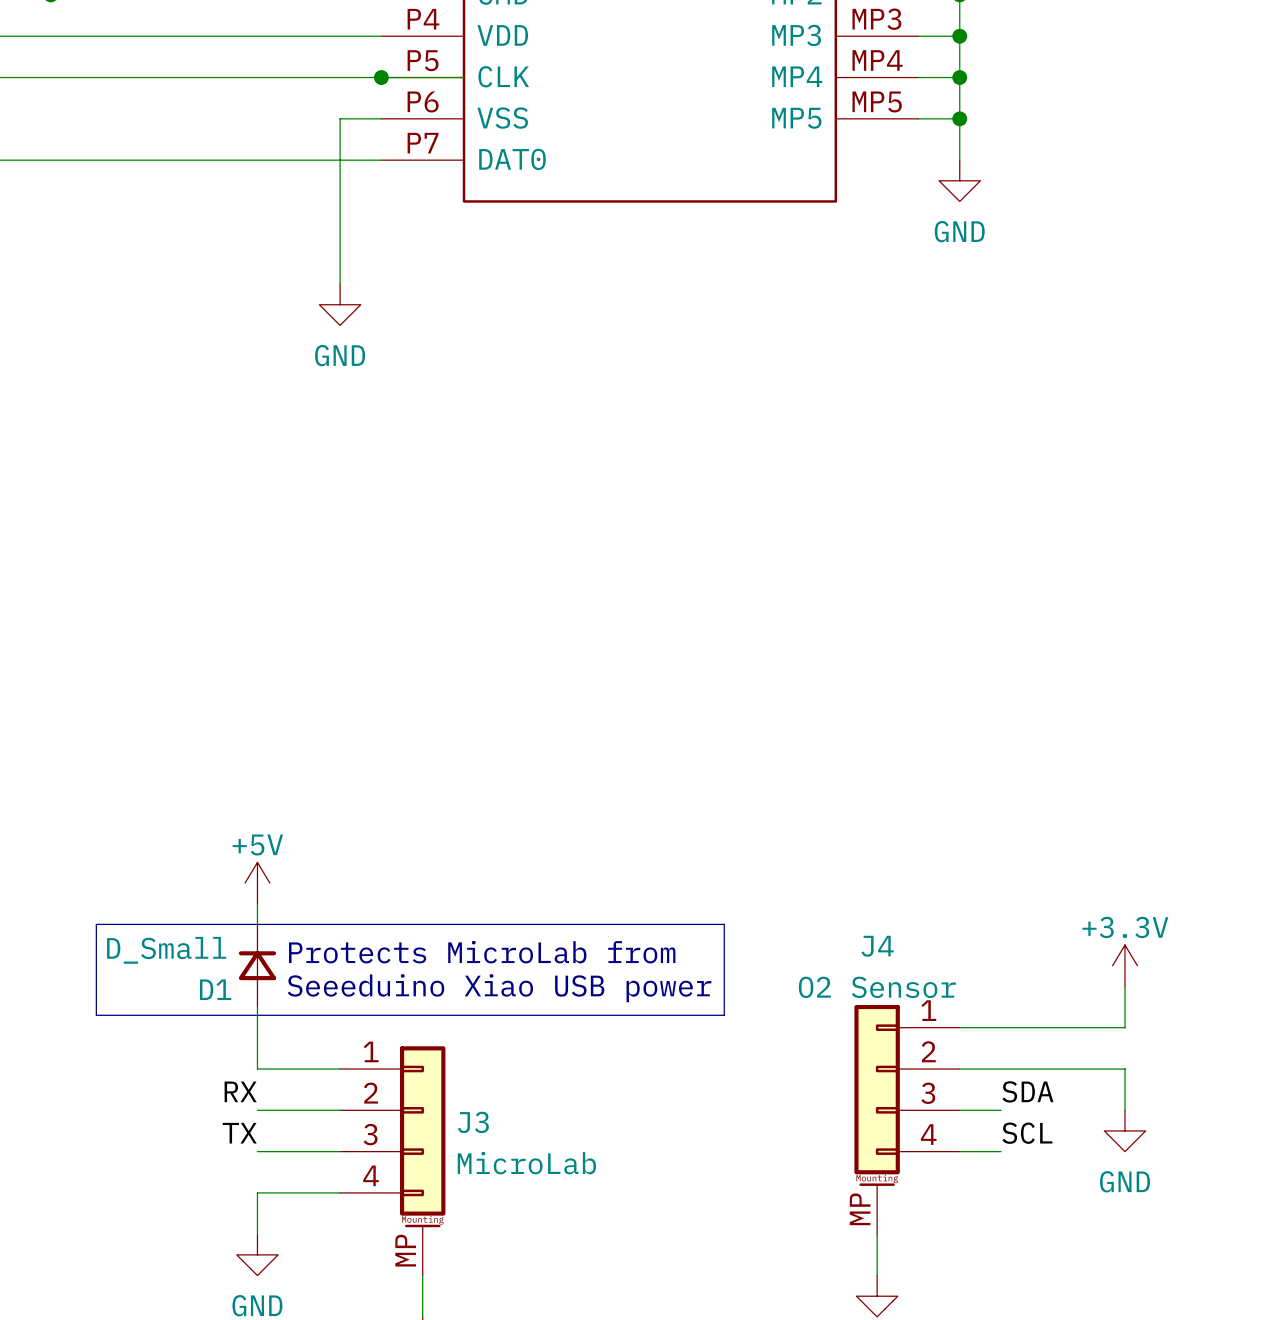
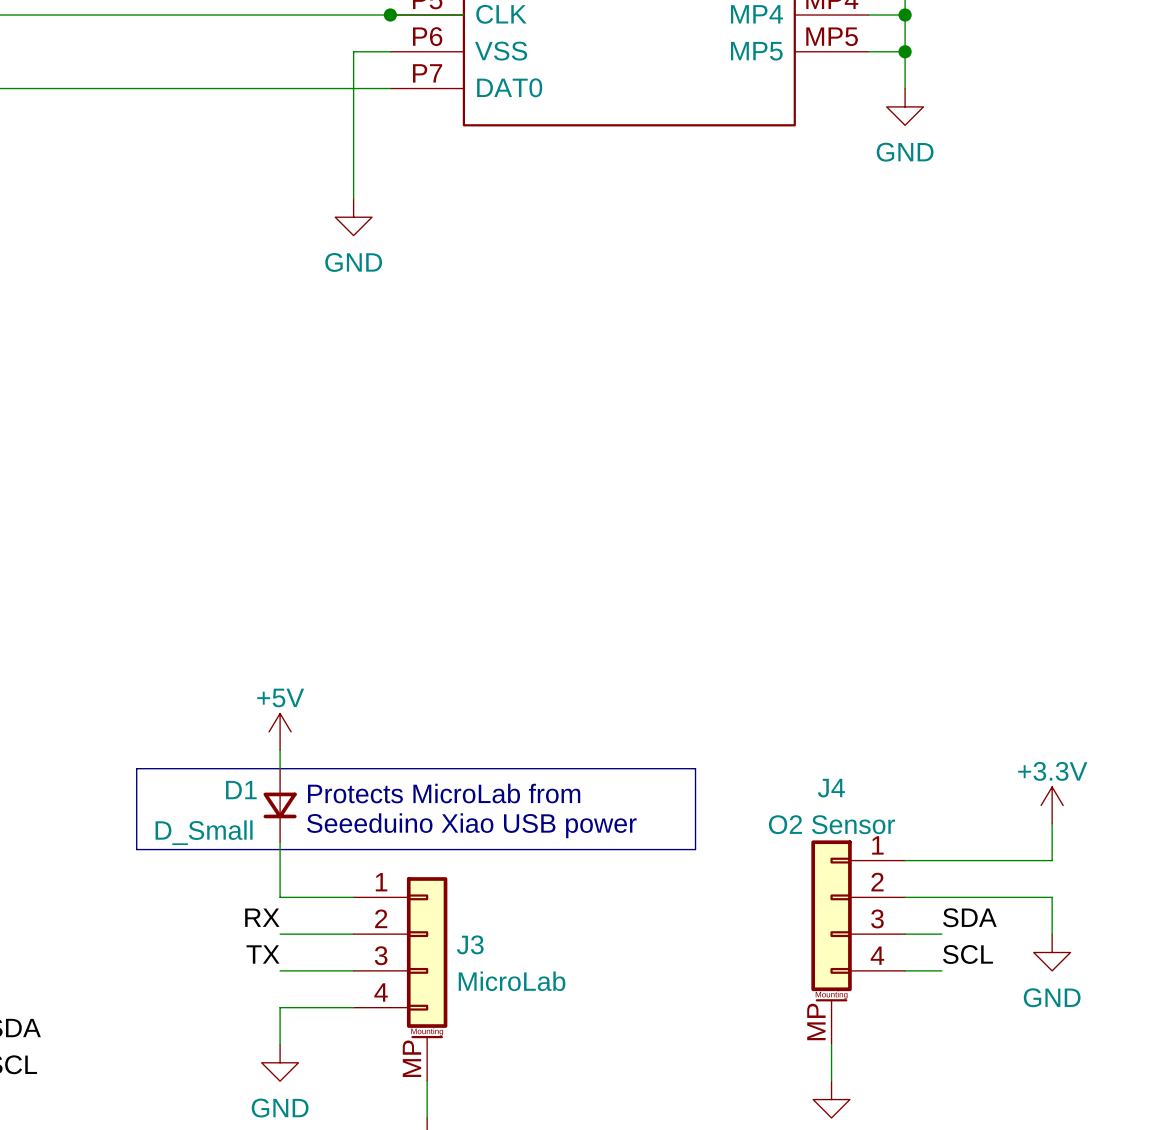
D1 value position: D_Small (166, 950) -> D_Small (204, 832)
D1 rotation: 0° (257, 965) -> 180° (280, 805)
D1 name position: D1 (215, 989) -> D1 (241, 790)

